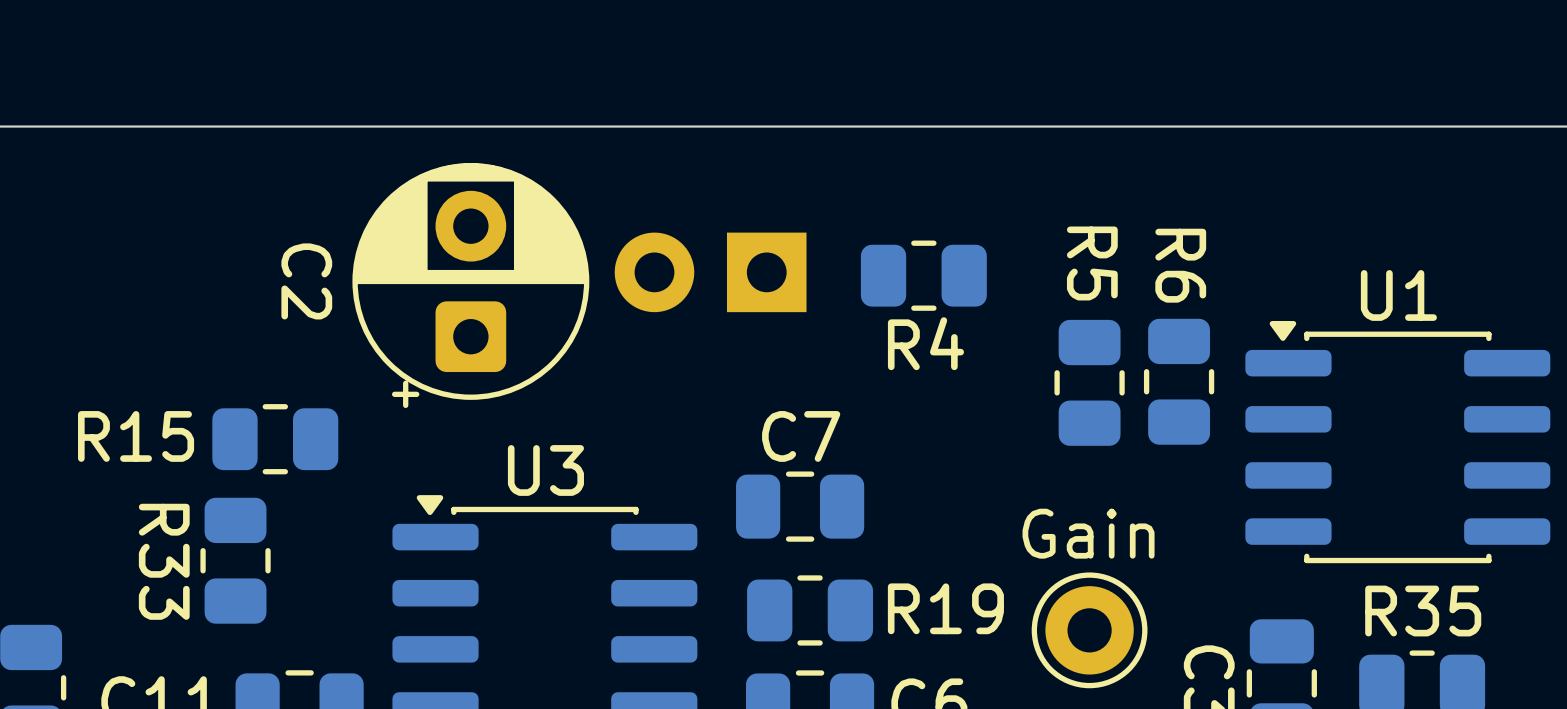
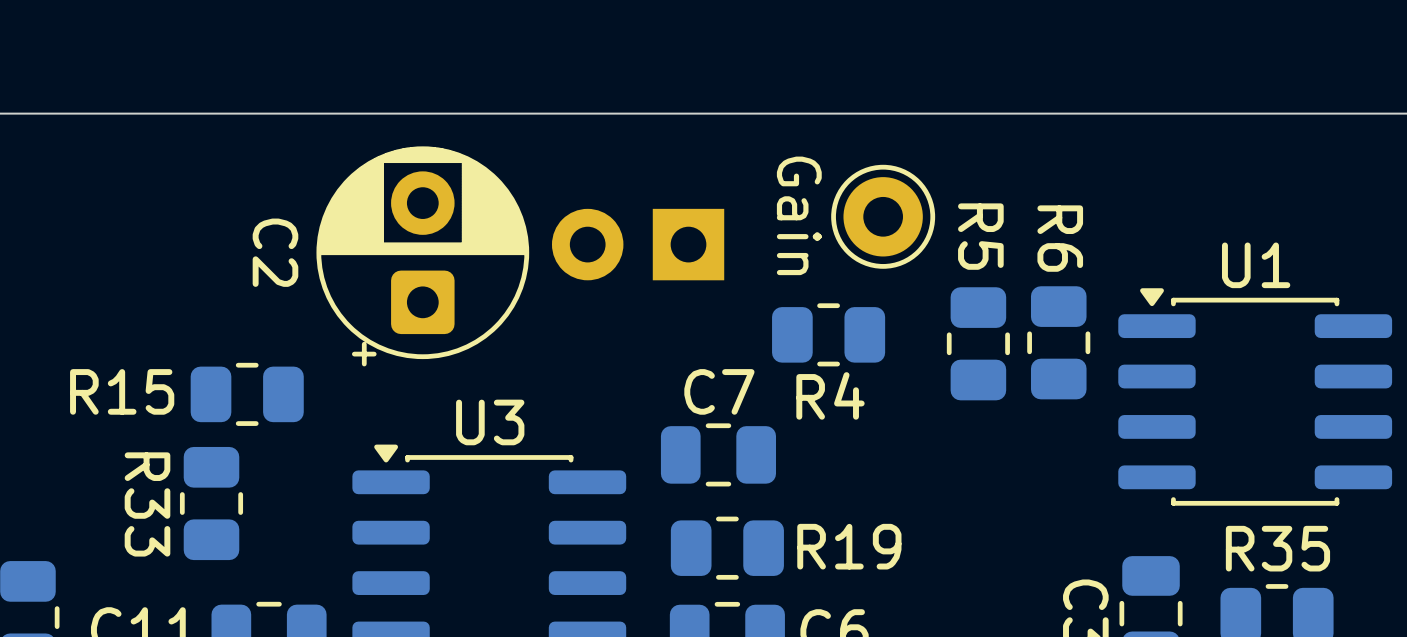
R4 position: (923, 275) -> (828, 334)
part value rotation: 0° (1088, 533) -> 90° clockwise (799, 215)
part position: (1089, 630) -> (883, 216)

